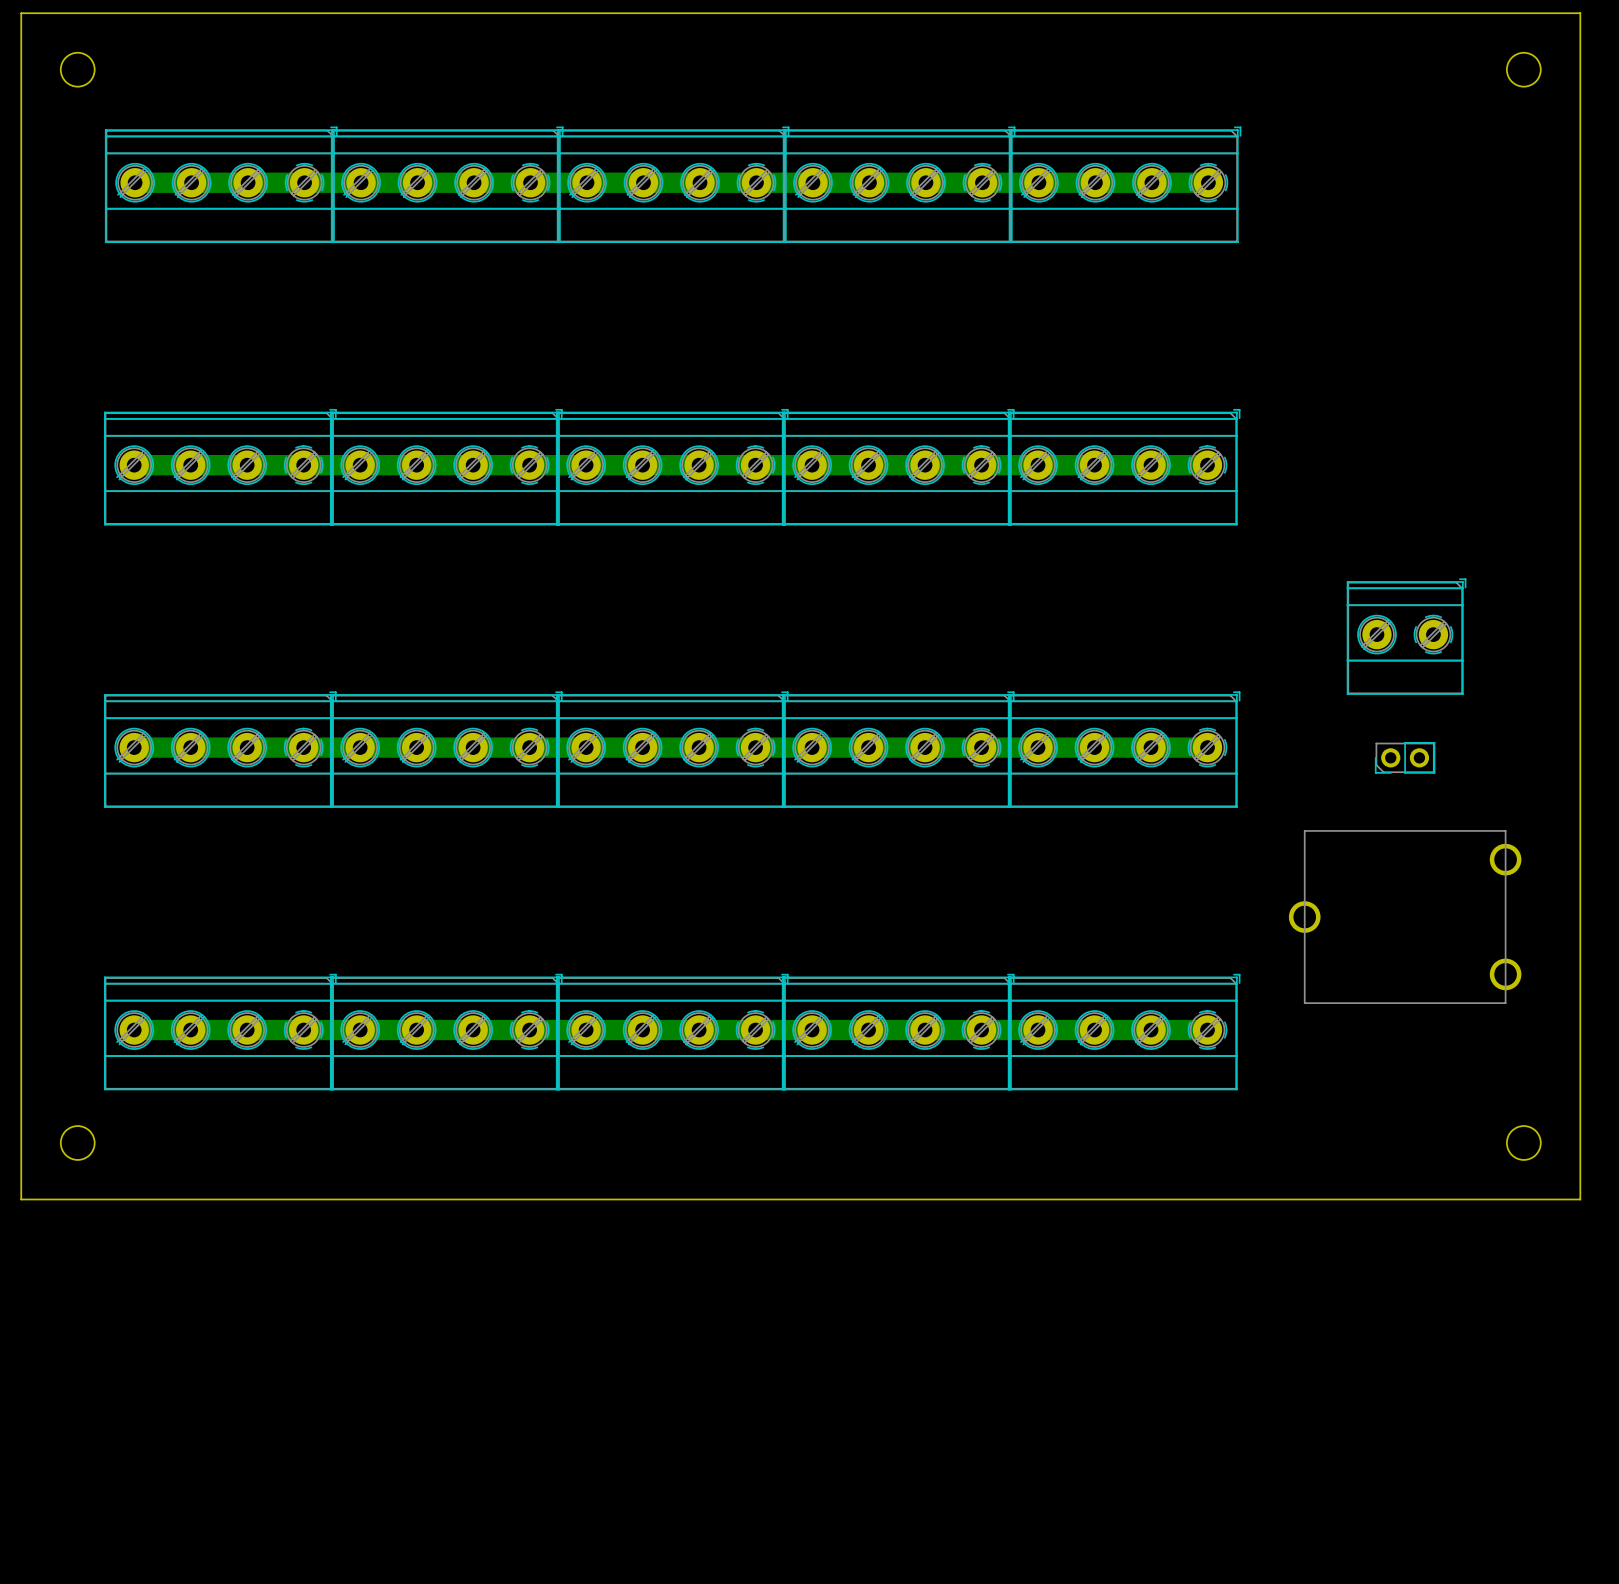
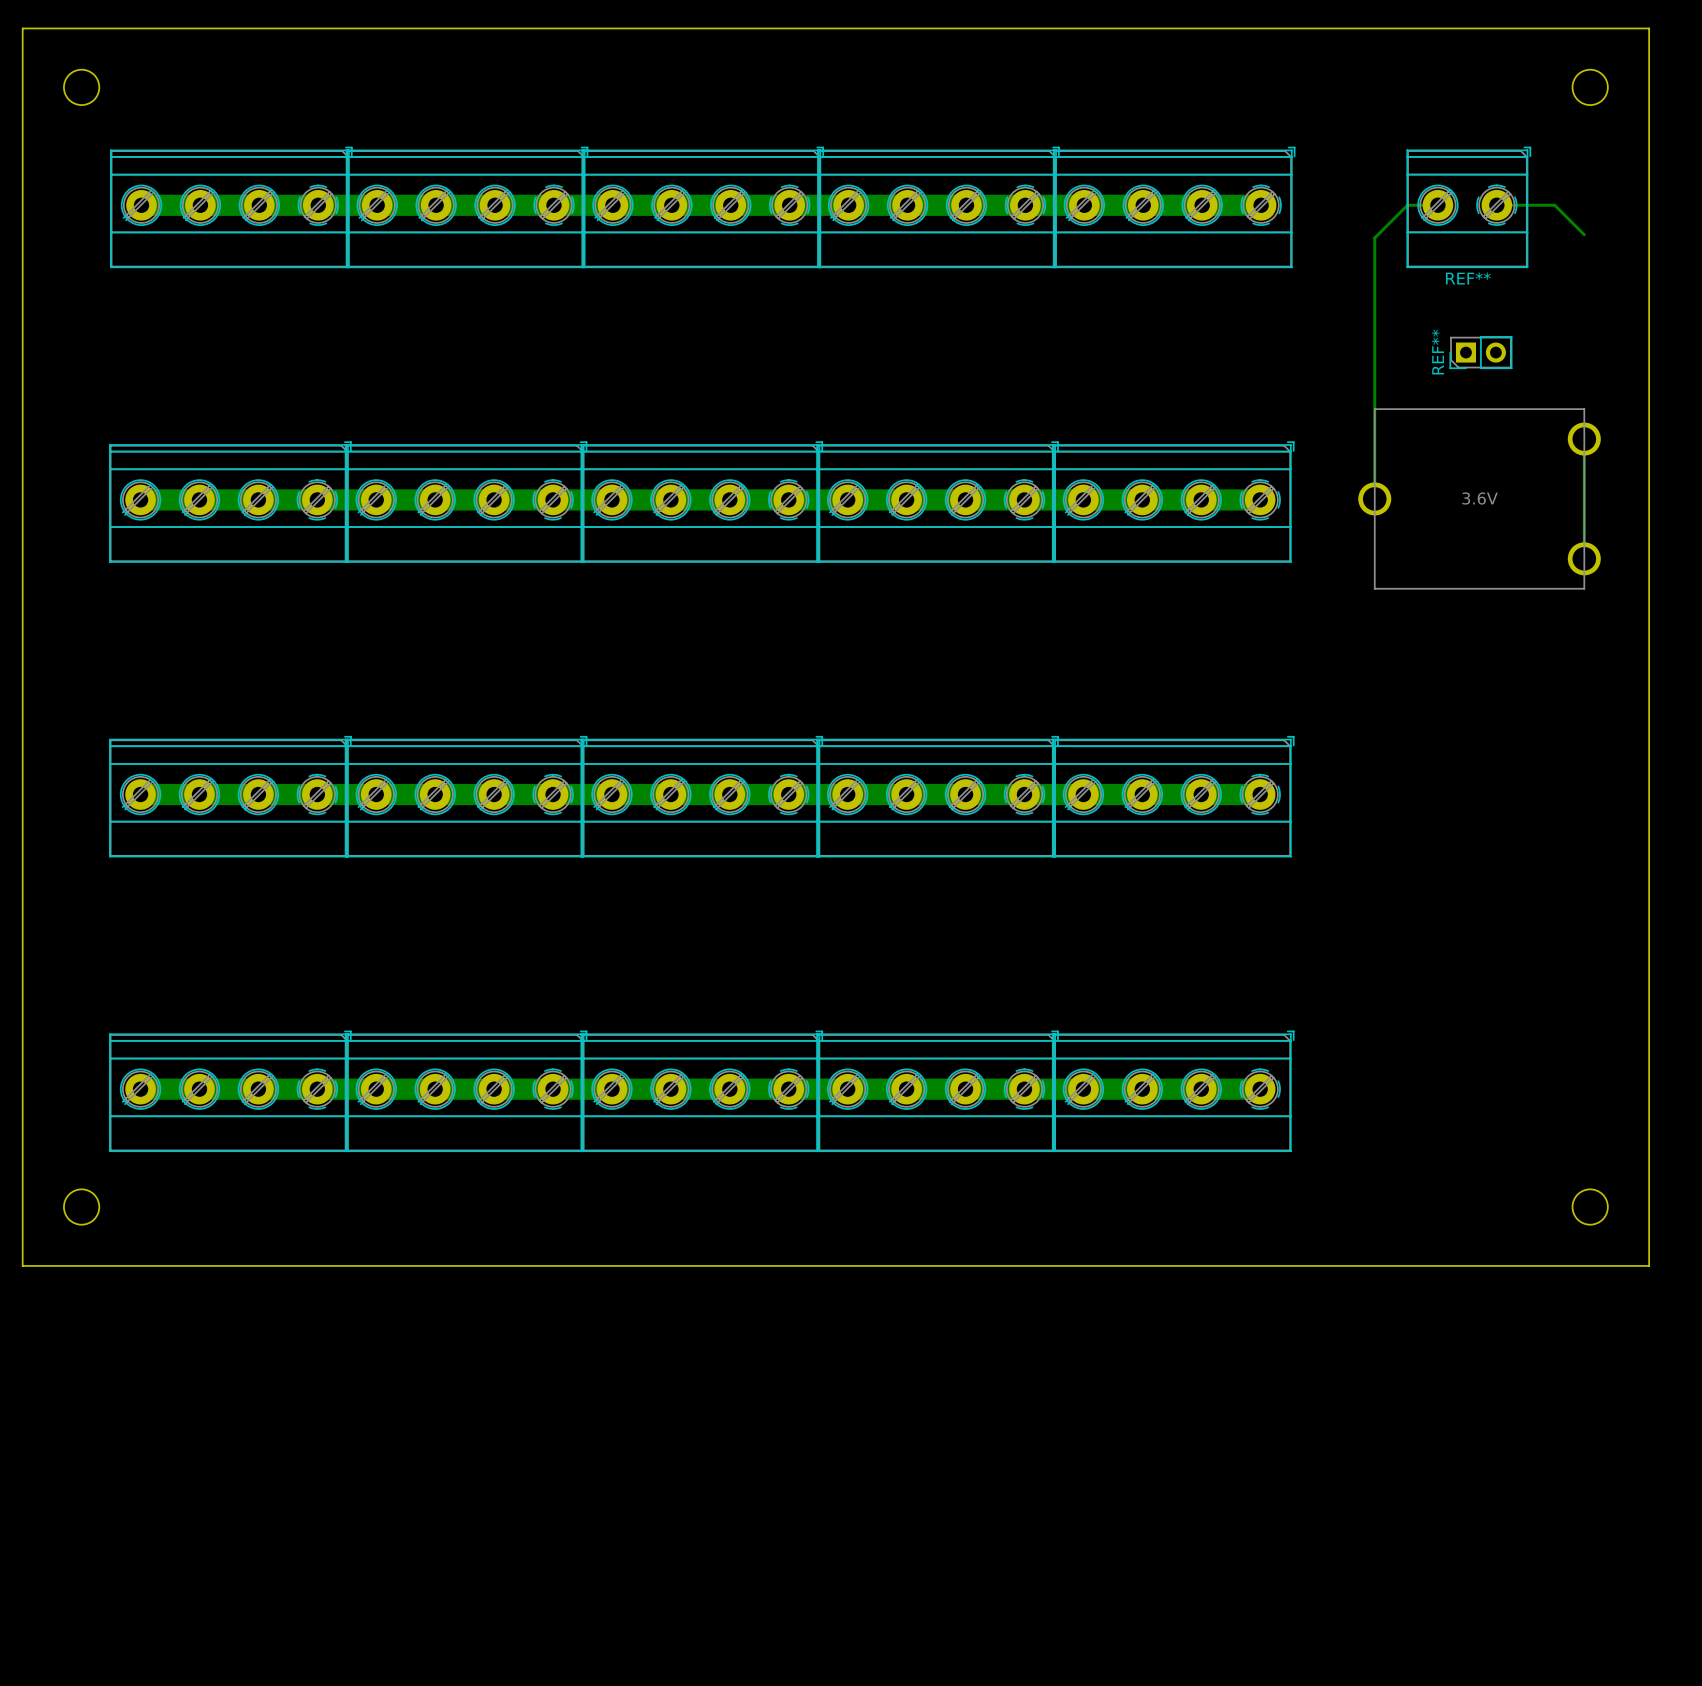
bottom track: none -> (1436, 205) (1407, 205) (1374, 238) (1374, 498)
bottom track: none -> (1496, 205) (1554, 205) (1584, 234)
REF**: none -> (1468, 207)
REF**: none -> (1480, 352)
bottom track: none -> (1584, 439) (1584, 558)
part: none -> 3.6V (1479, 498)
part: (1406, 636) -> none
part: (1405, 757) -> none
part: (1405, 917) -> none

